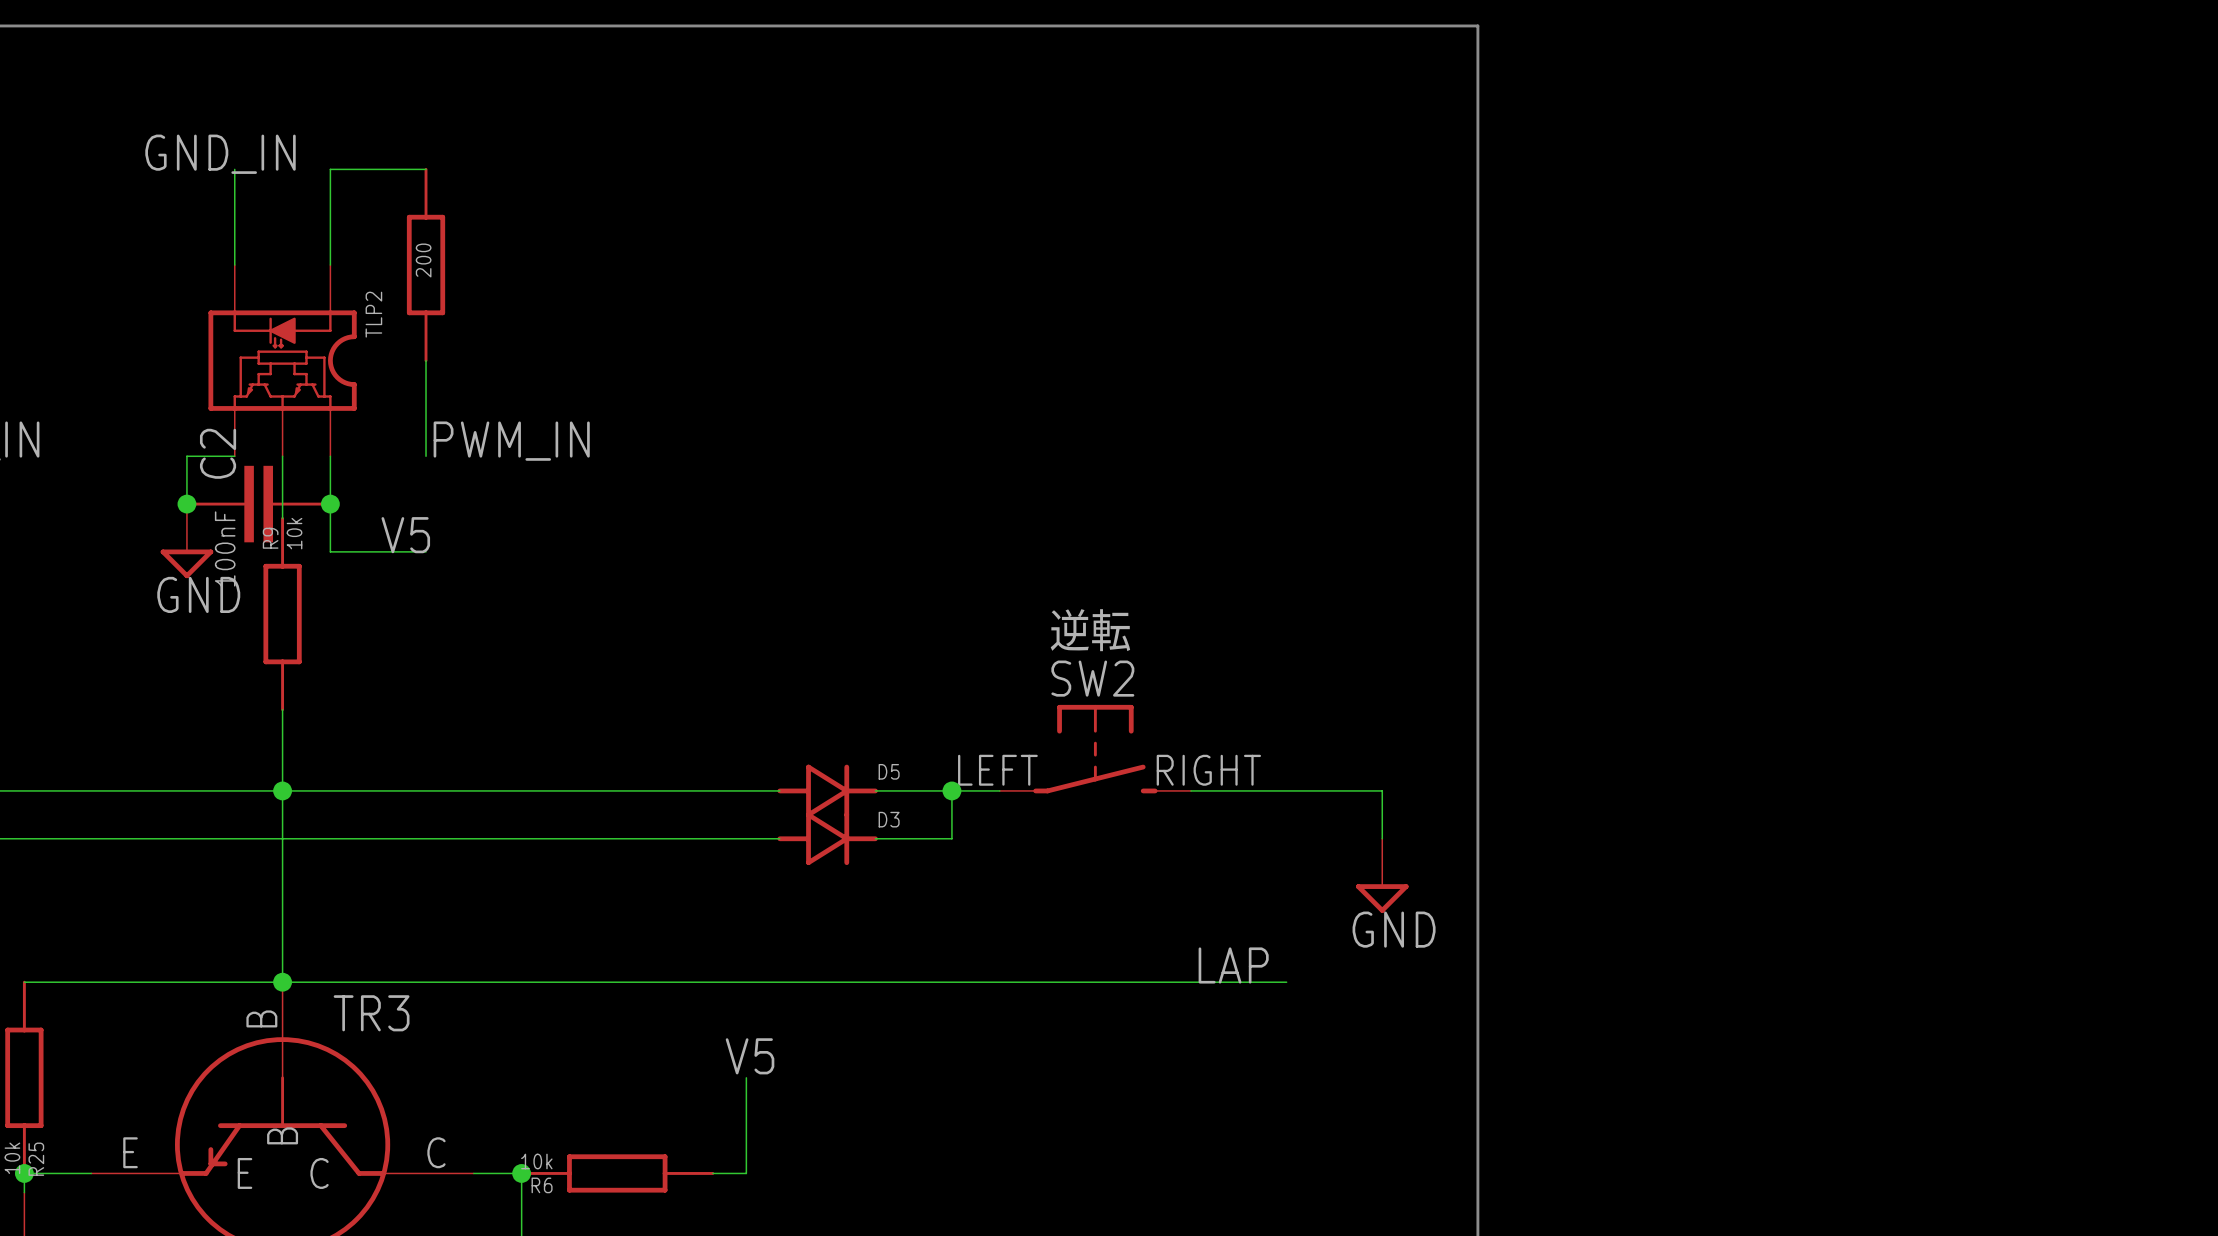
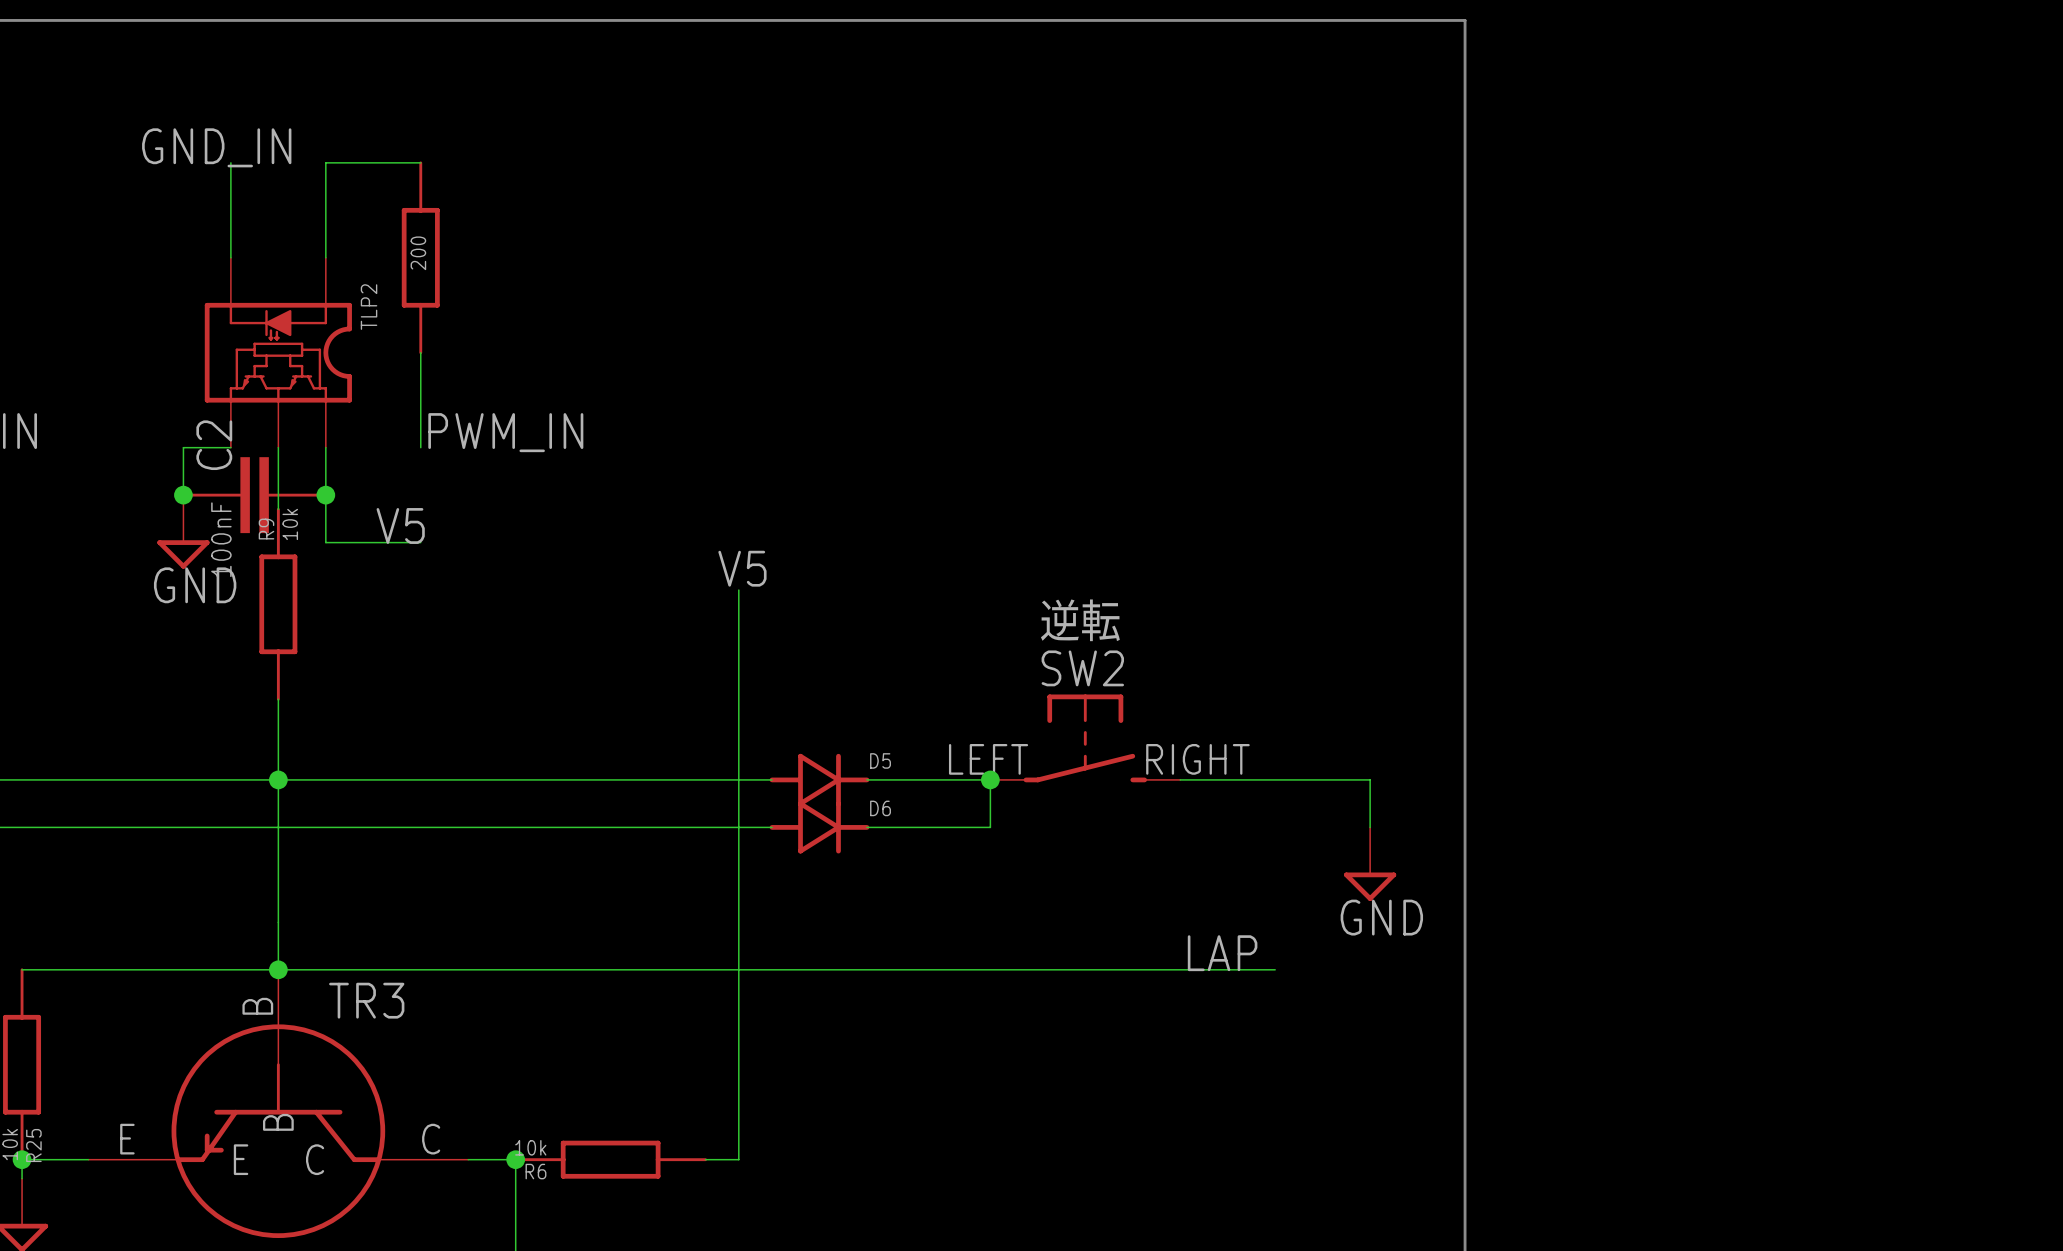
label: none -> V5 (742, 568)
wire: none -> (738, 590) (738, 1064)
wire: (951, 790) (951, 838) -> (990, 779) (990, 827) (942, 827)
junction position: (951, 790) -> (990, 779)
D3 name: D3 (889, 819) -> D6 (880, 808)
label: V5 (750, 1056) -> none

